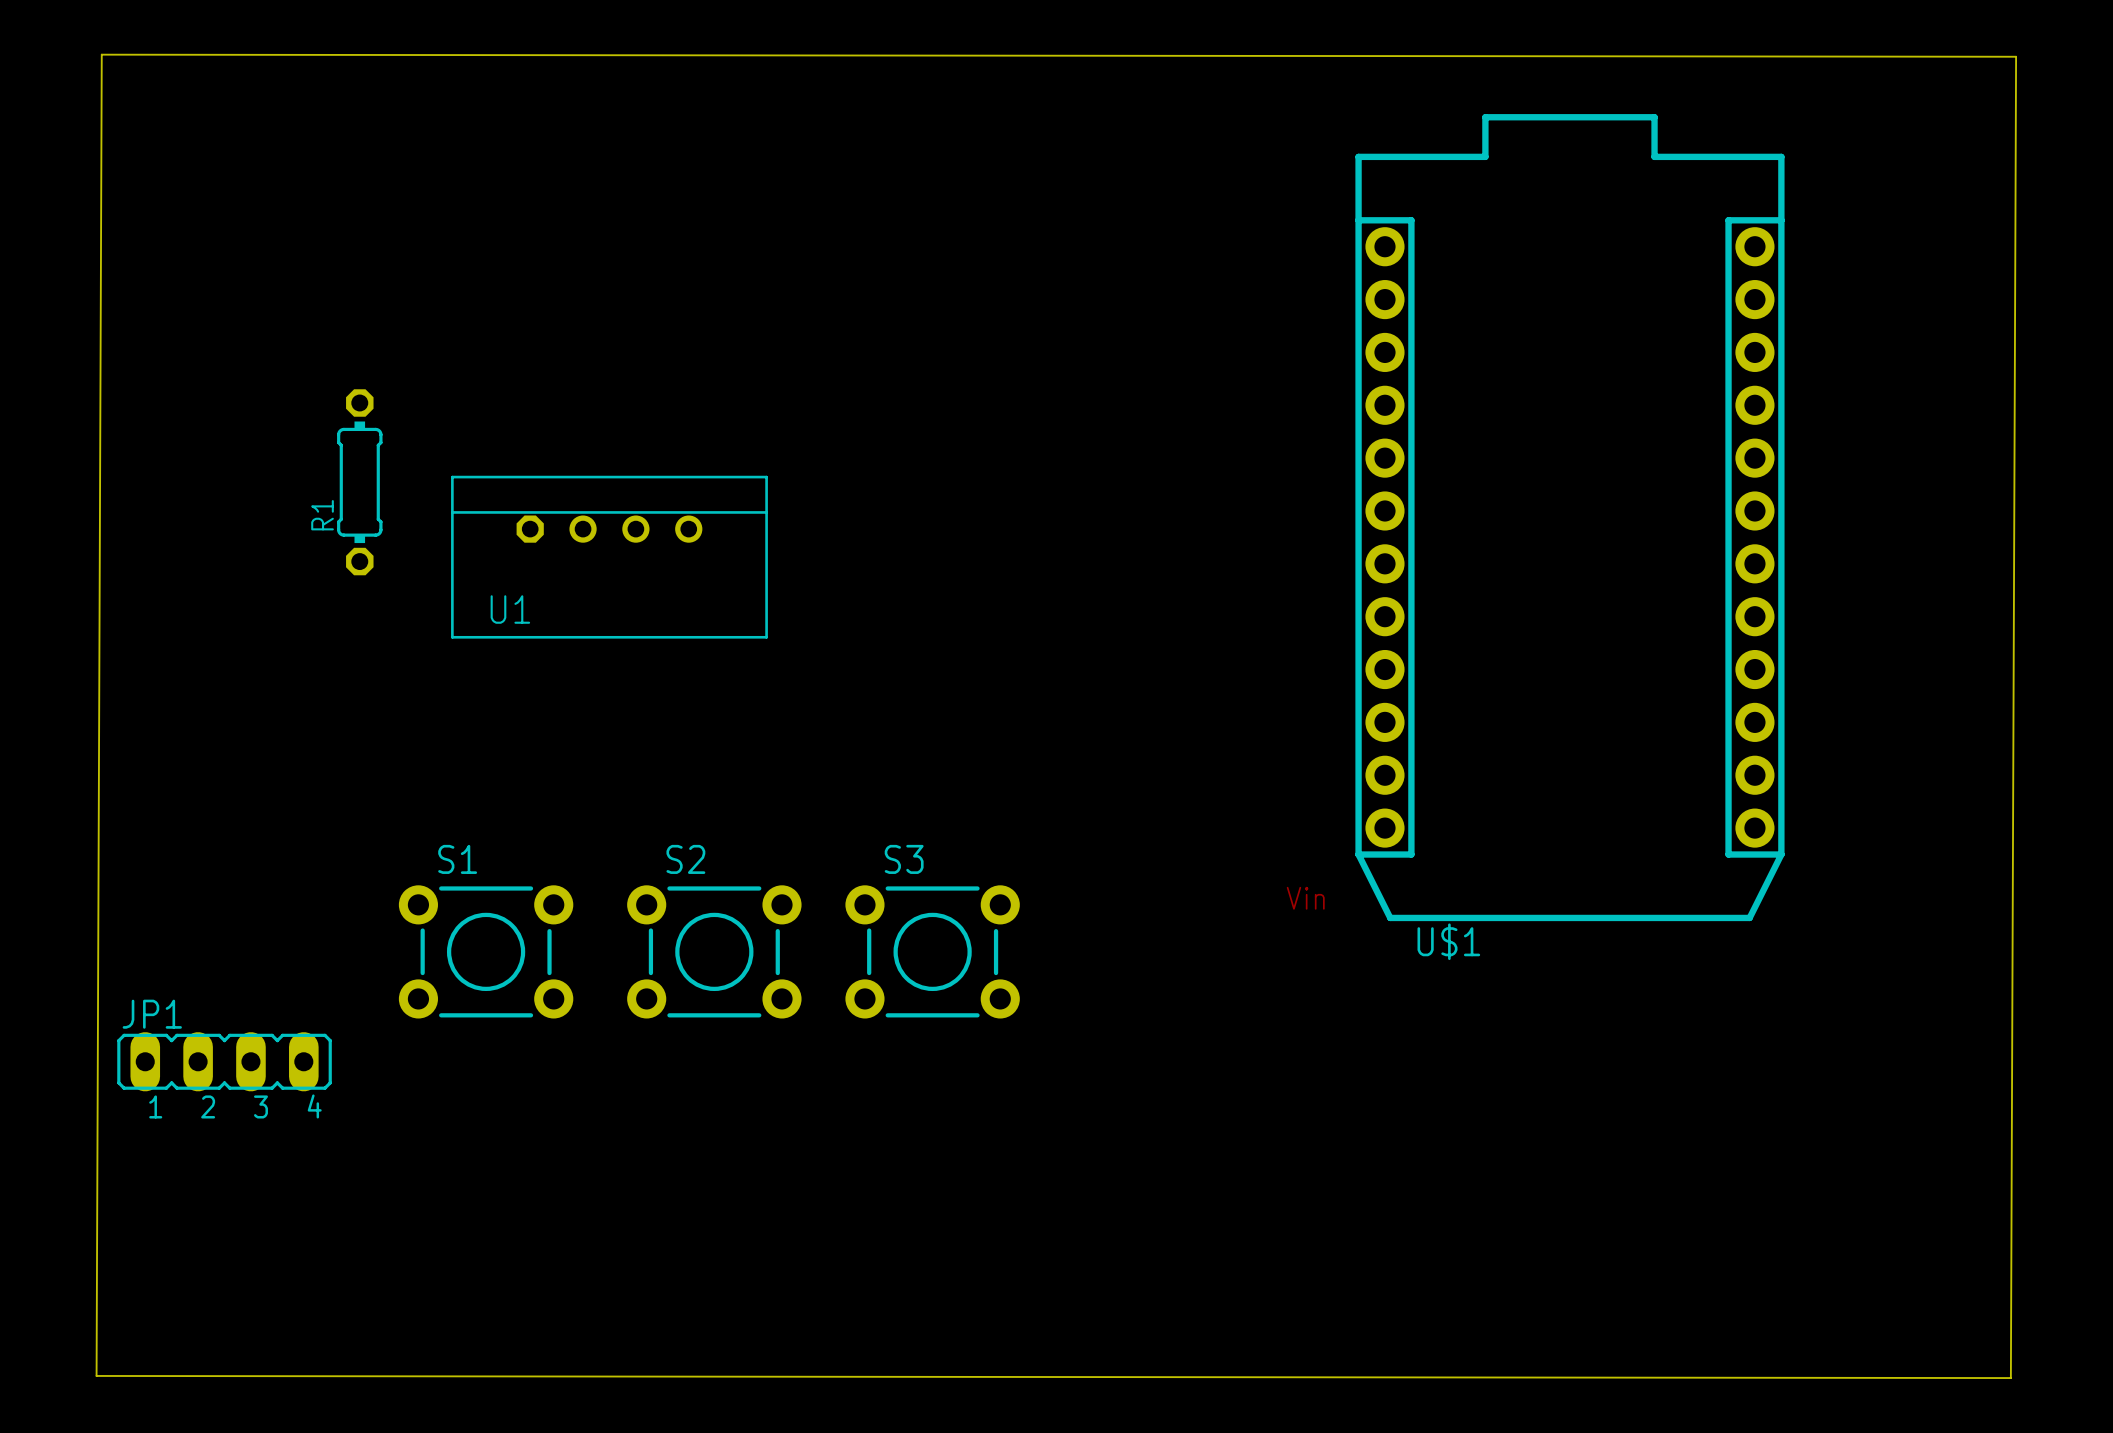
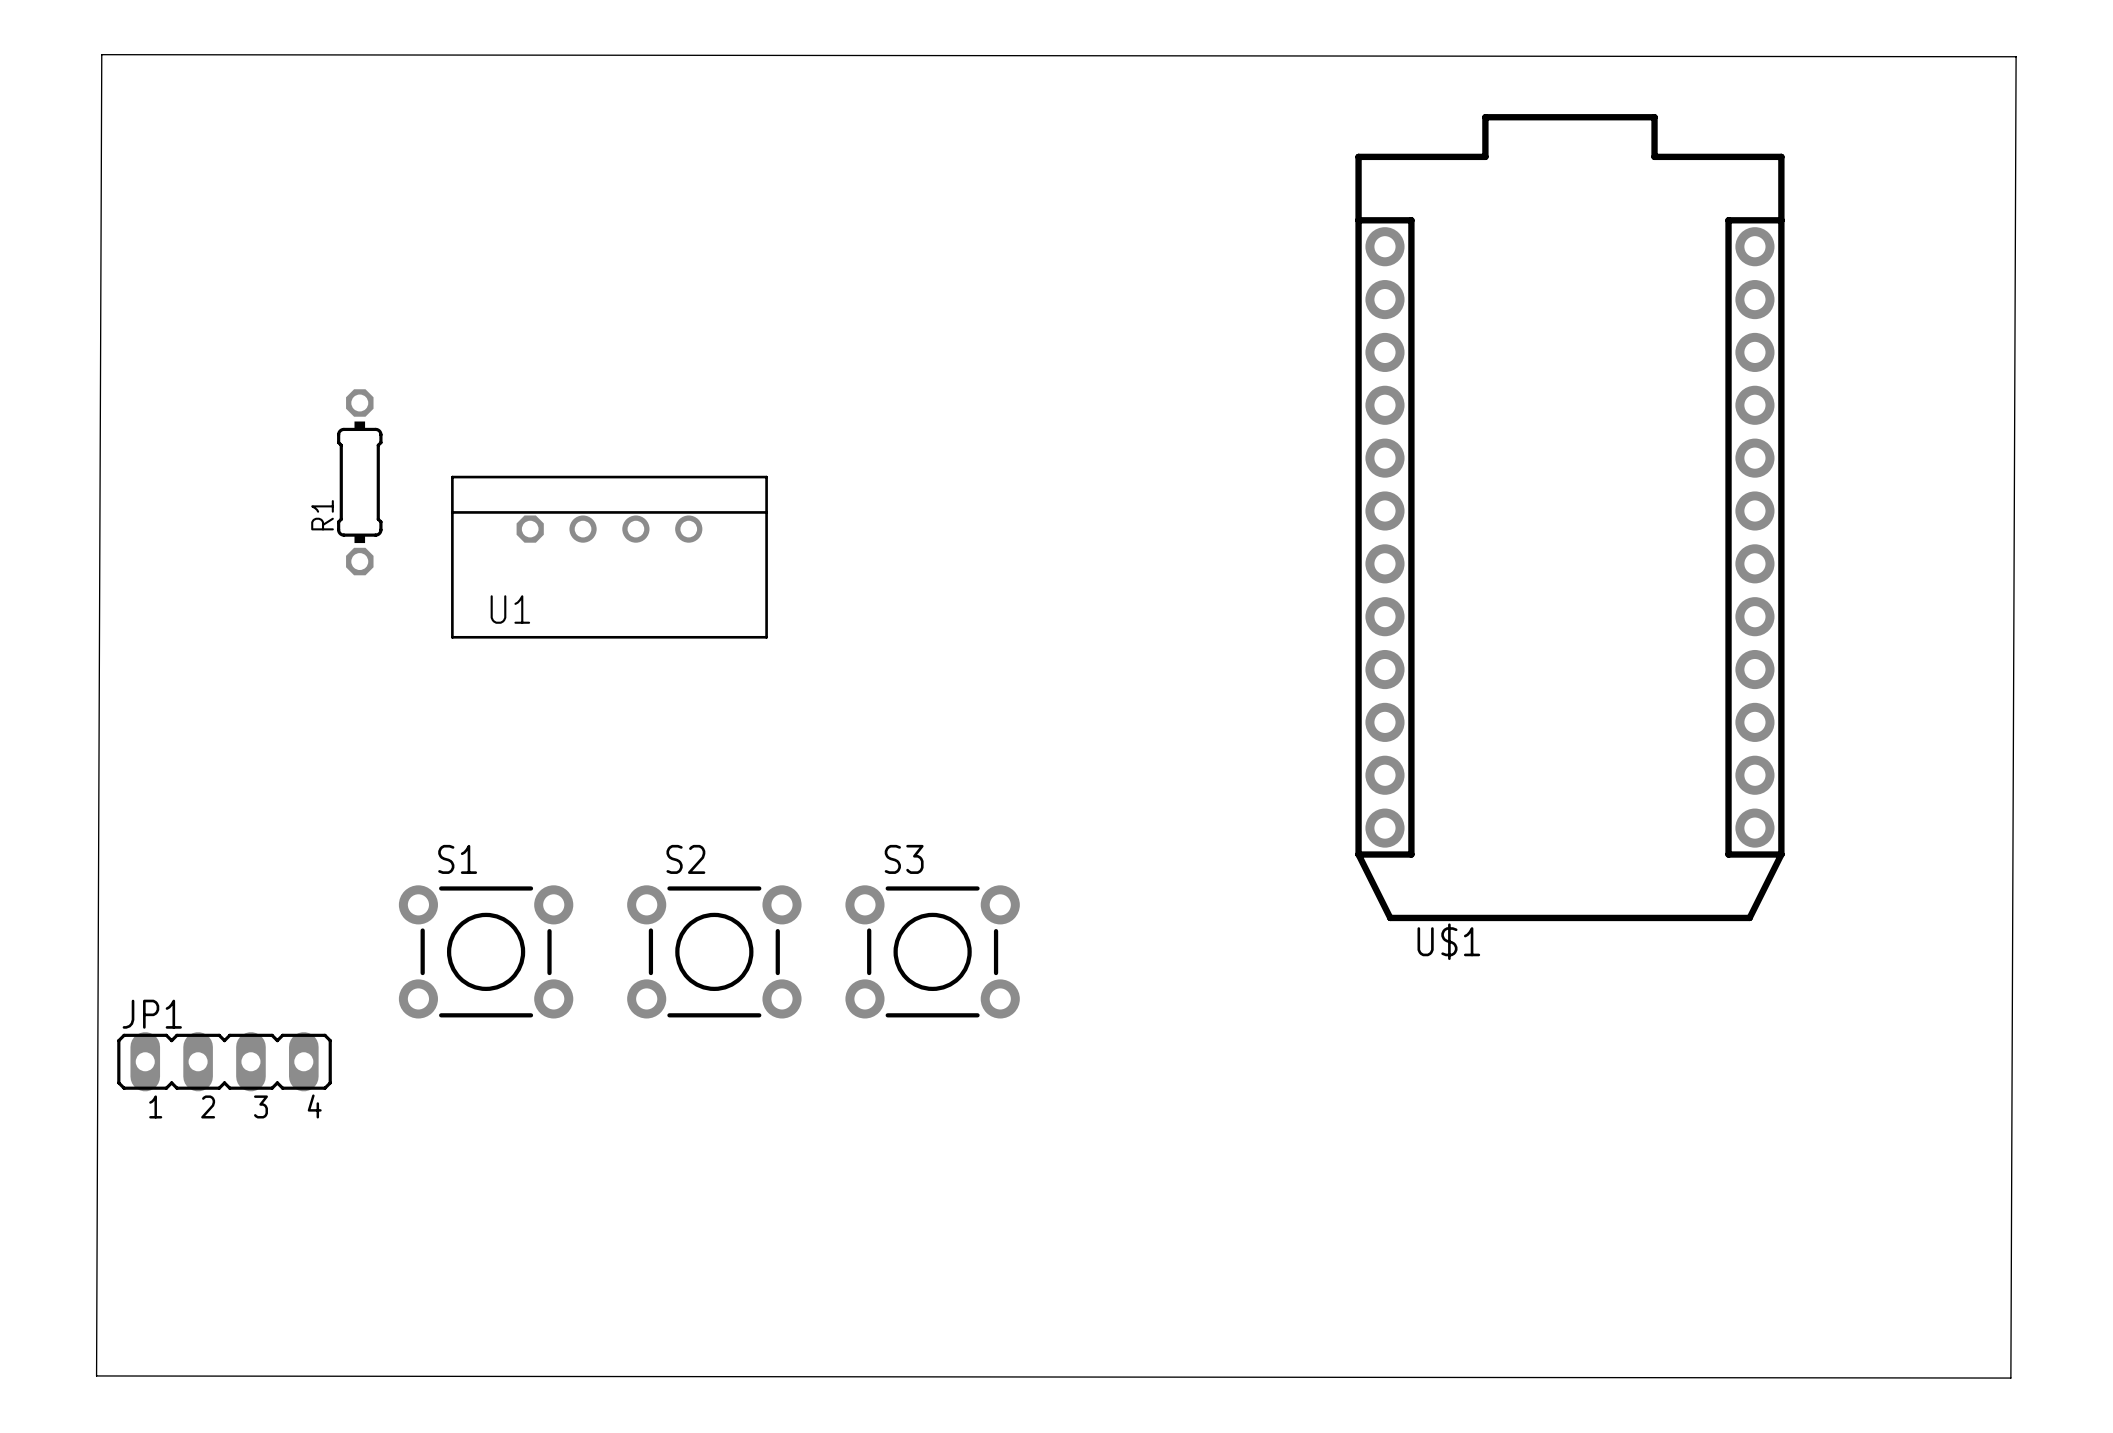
text: Vin (1305, 898) -> none

